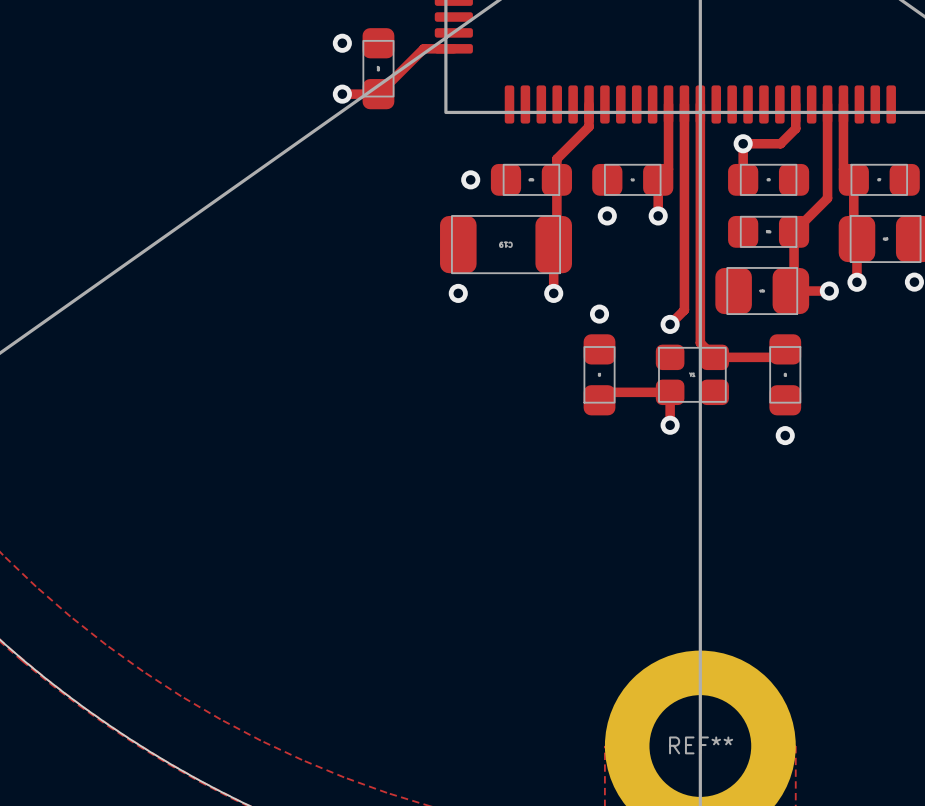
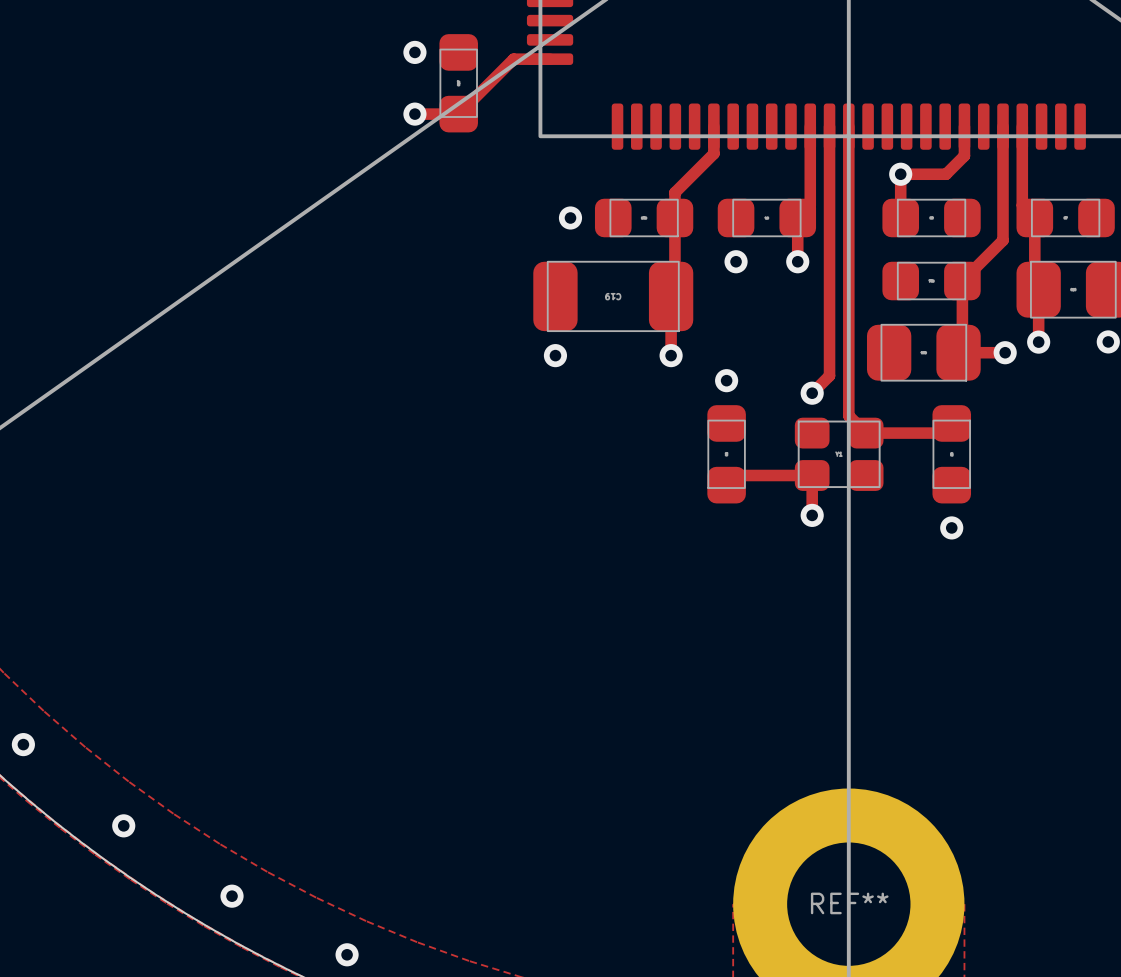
via: none -> (23, 744)
via: none -> (123, 825)
via: none -> (232, 896)
via: none -> (347, 954)

